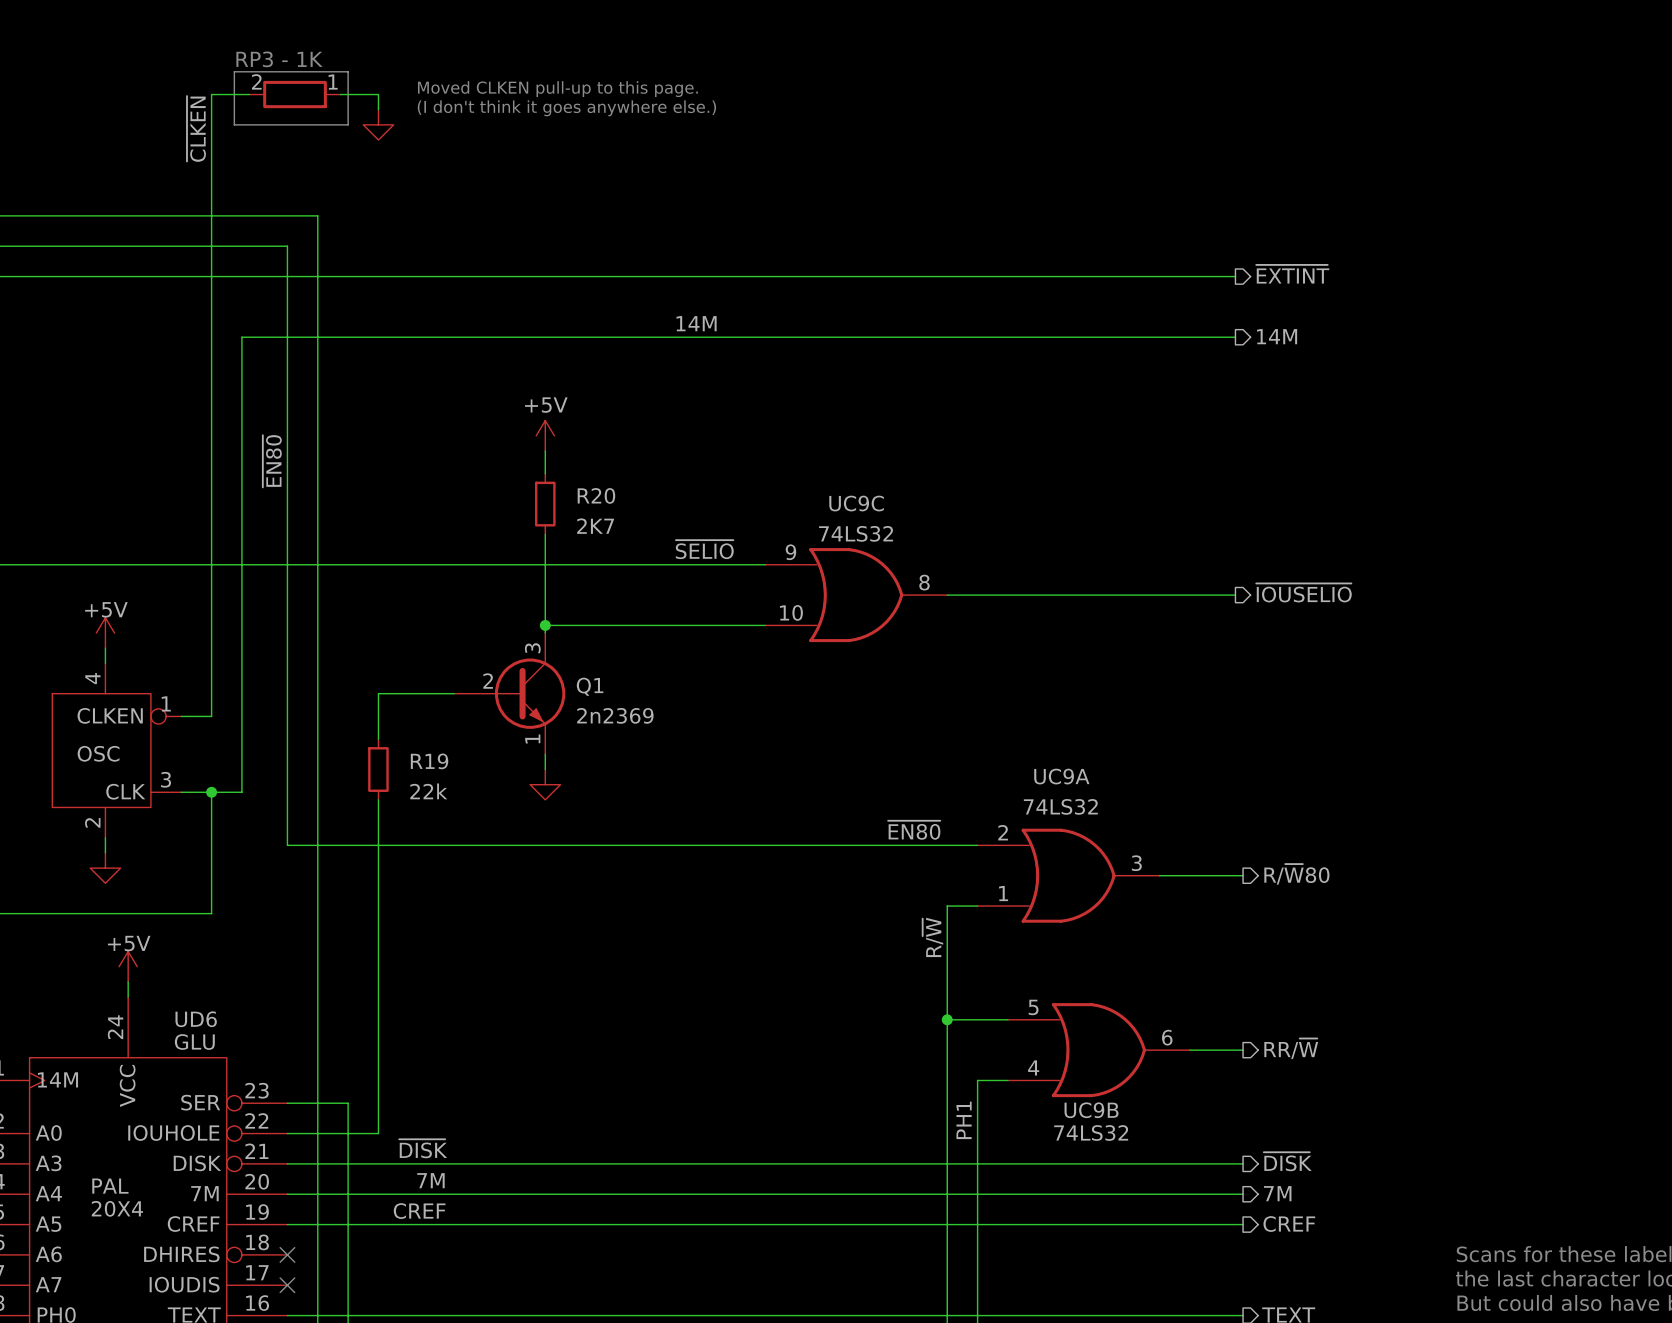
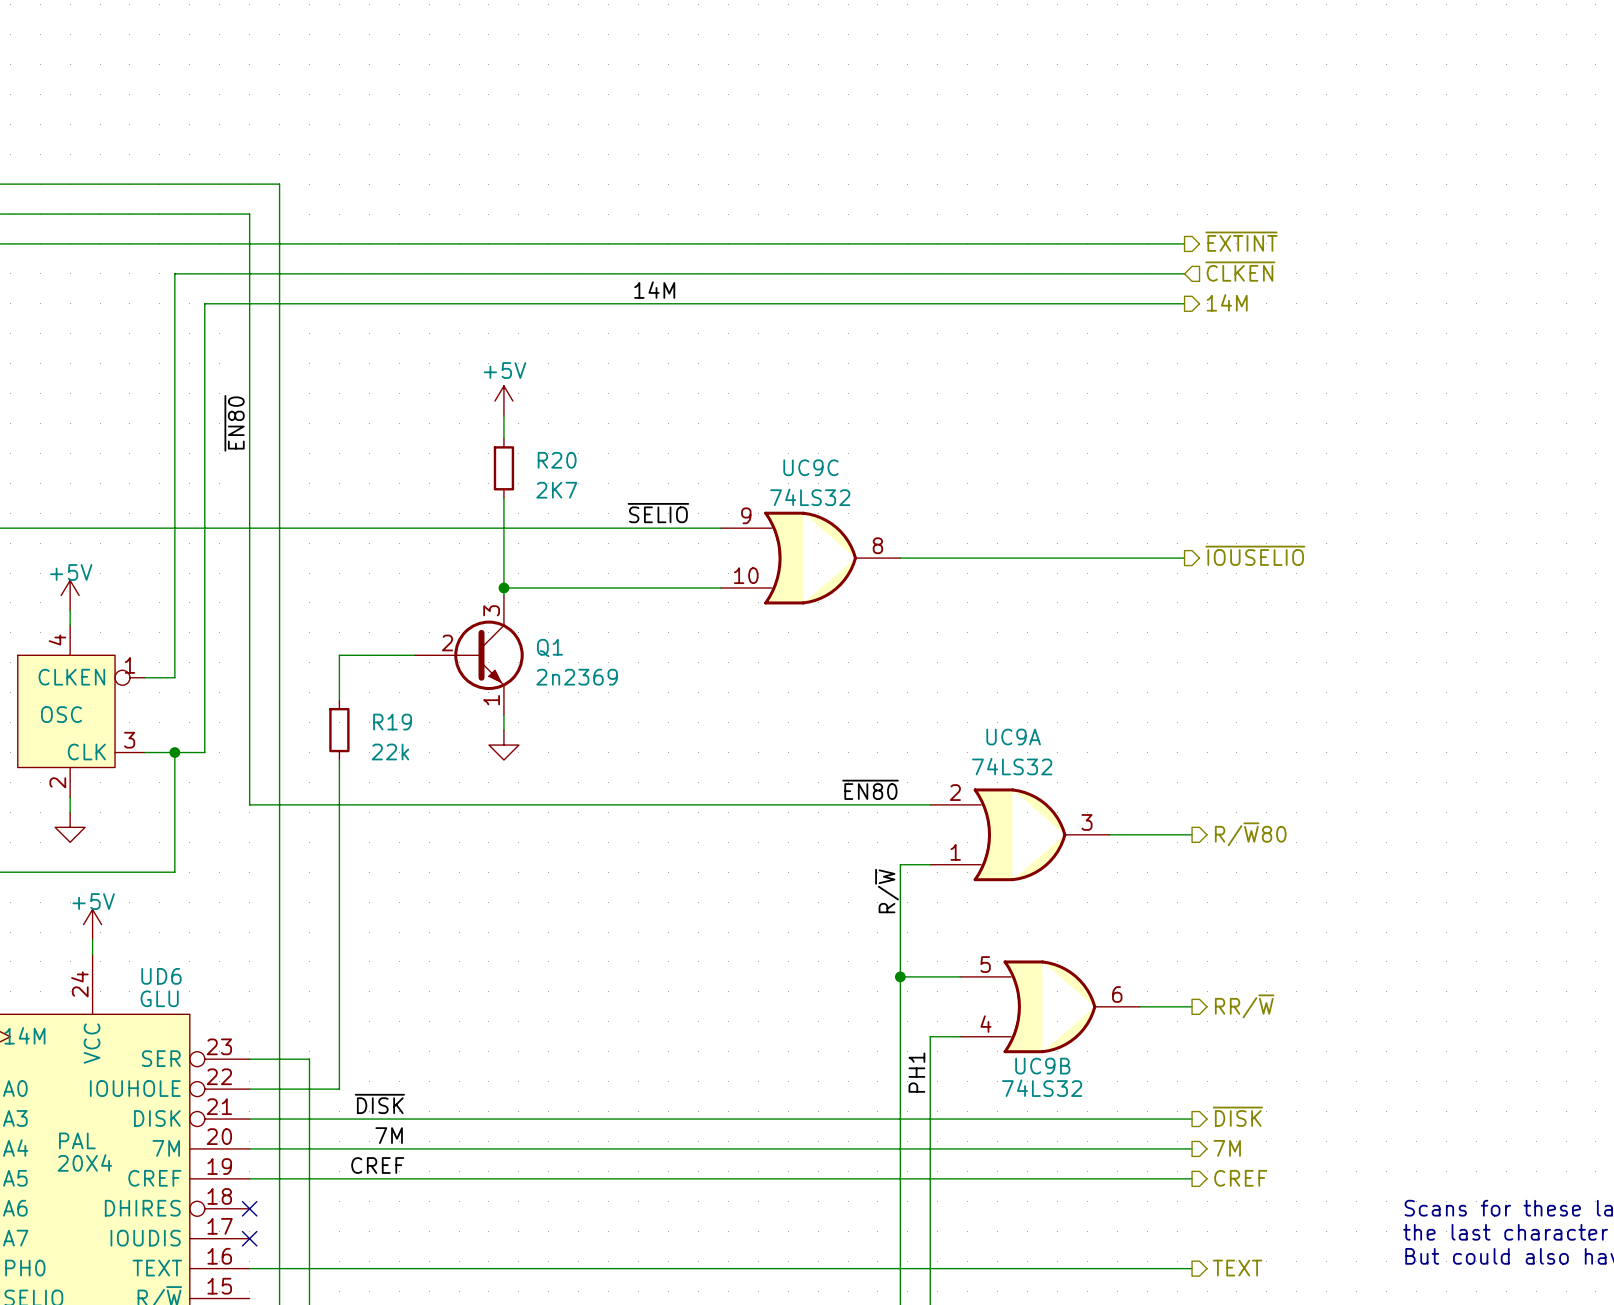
text: RP3 - 1K (279, 59) -> none
line: (234, 71) (348, 71) (348, 124) (234, 124) (234, 71) -> none
text: Moved CLKEN pull-up to this page. (557, 89) -> none
wire: (249, 94) (211, 94) (211, 306) -> (1184, 273) (174, 273)
part: (295, 94) -> none
wire: (340, 94) (378, 94) (378, 109) -> none
text: (I don't think it goes anywhere else.) (566, 108) -> none
power symbol: (378, 124) -> none
label: ~{CLKEN} (196, 128) -> none
hierarchical label: none -> ~{CLKEN} (1240, 271)

